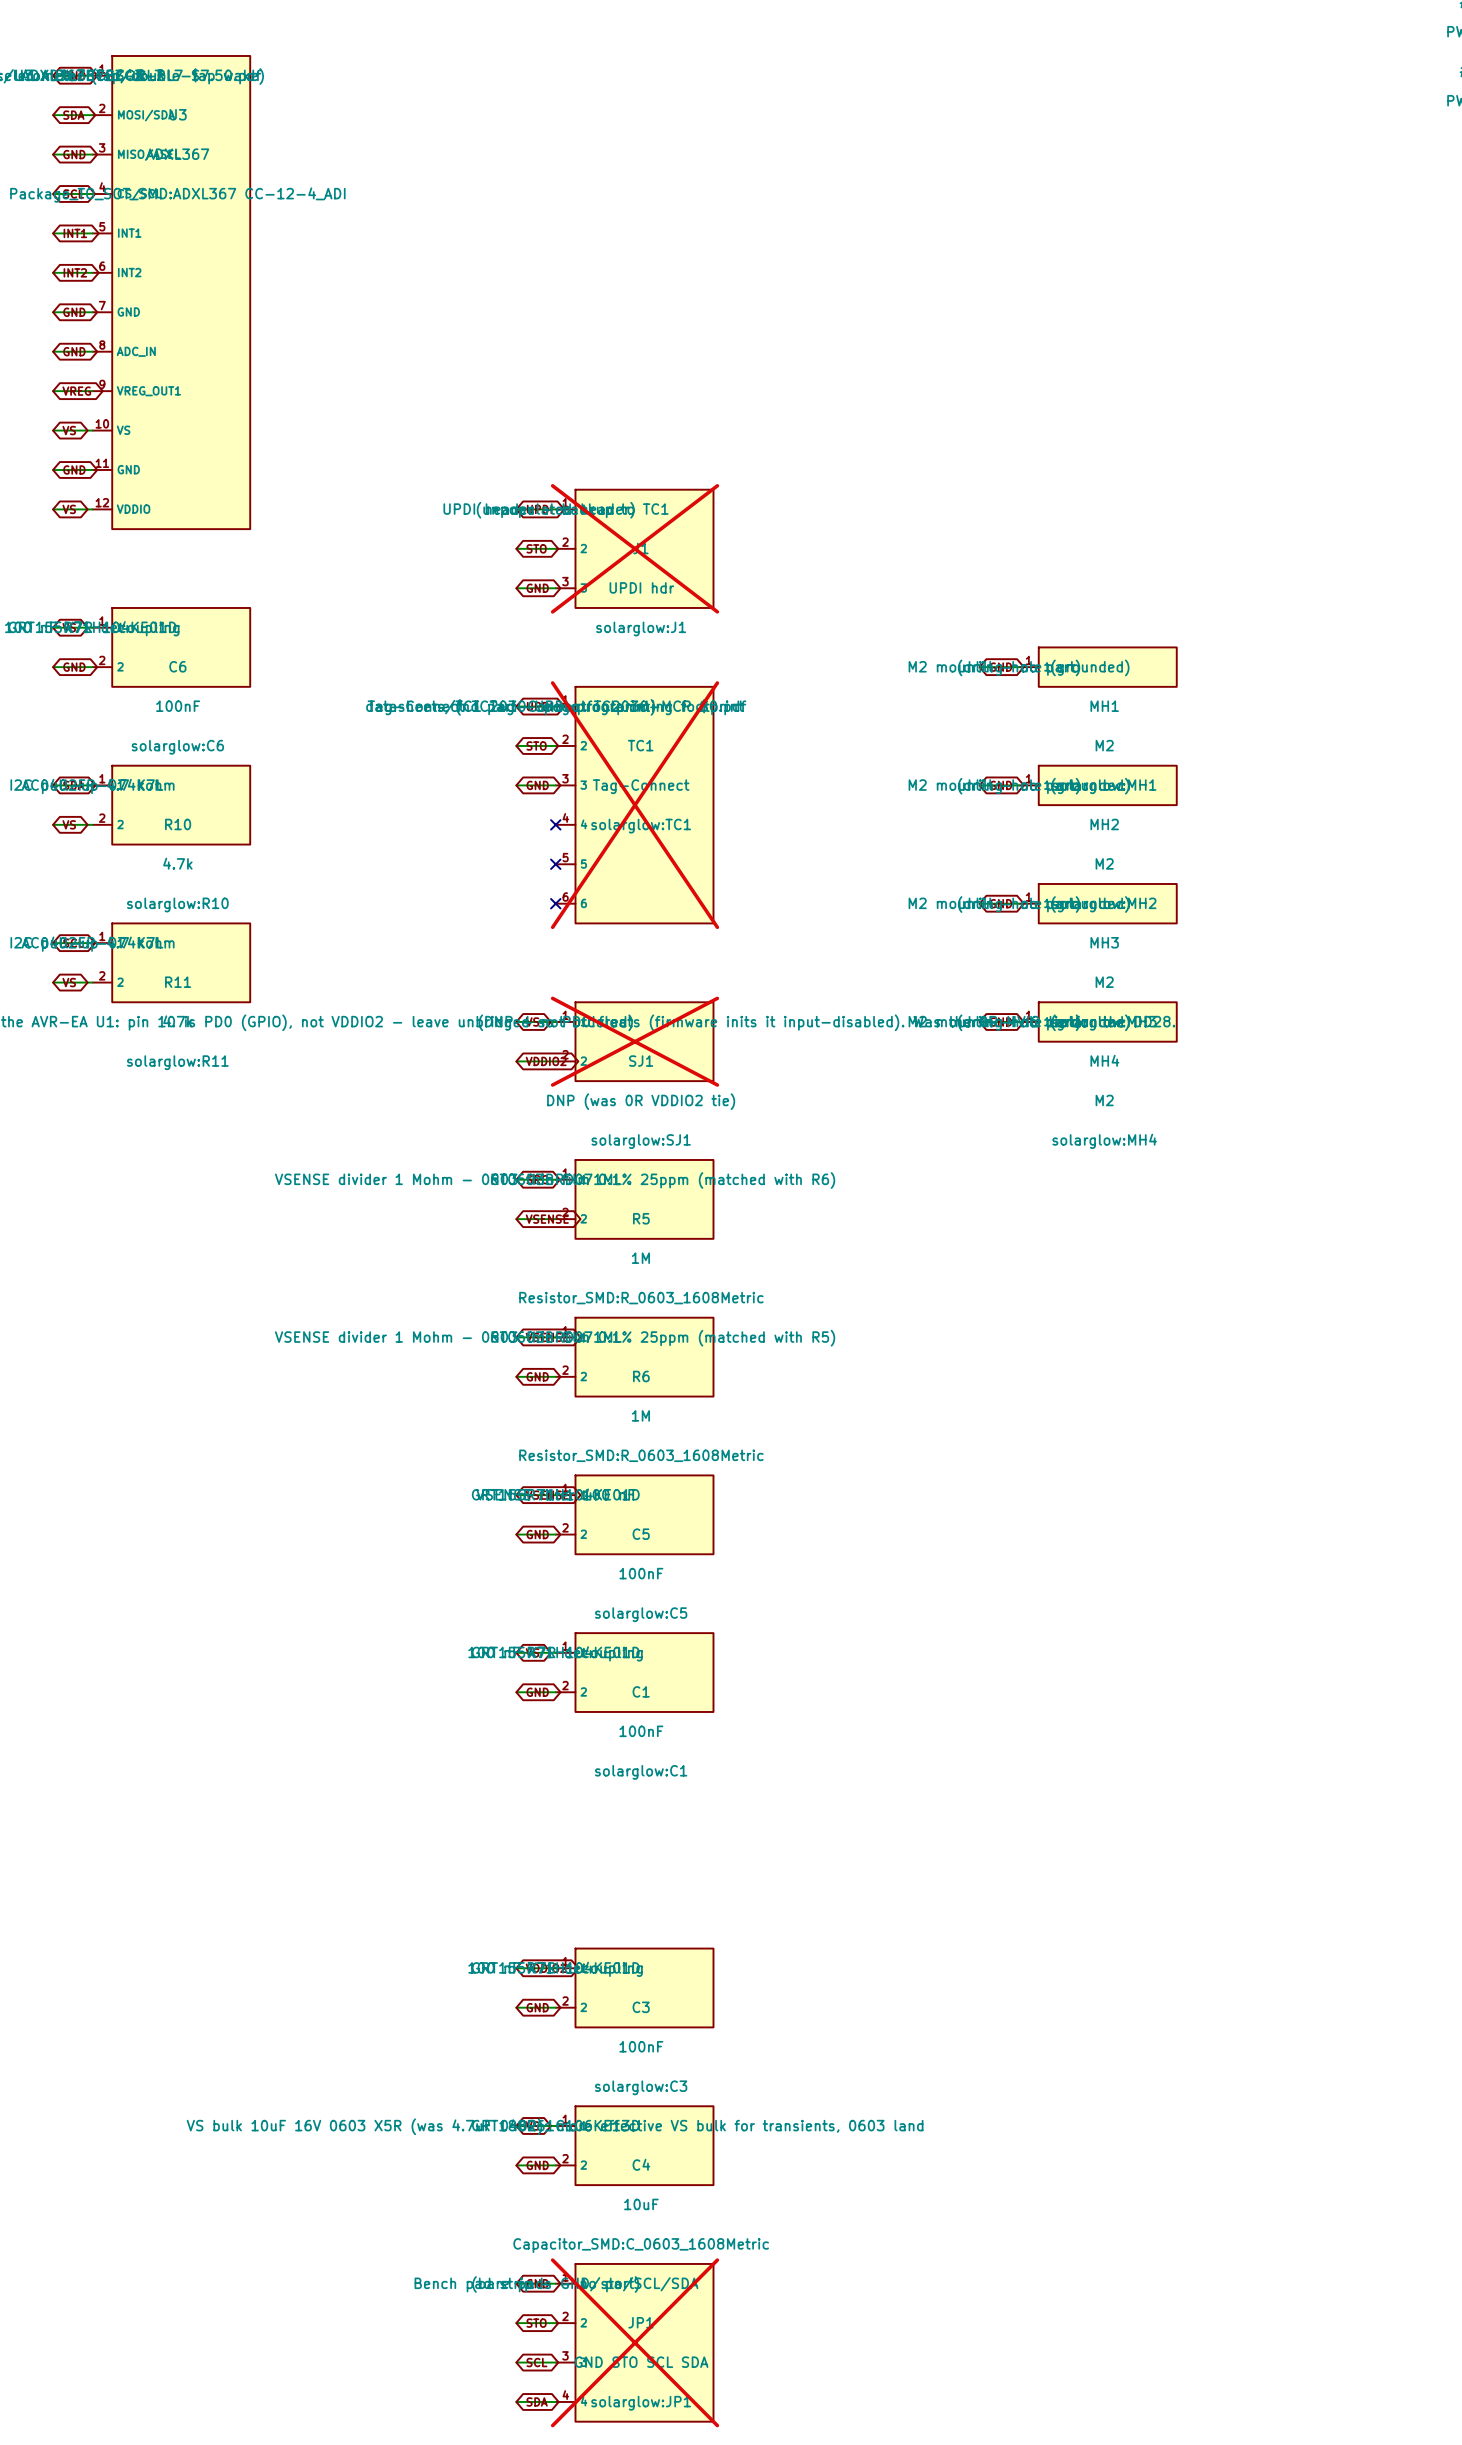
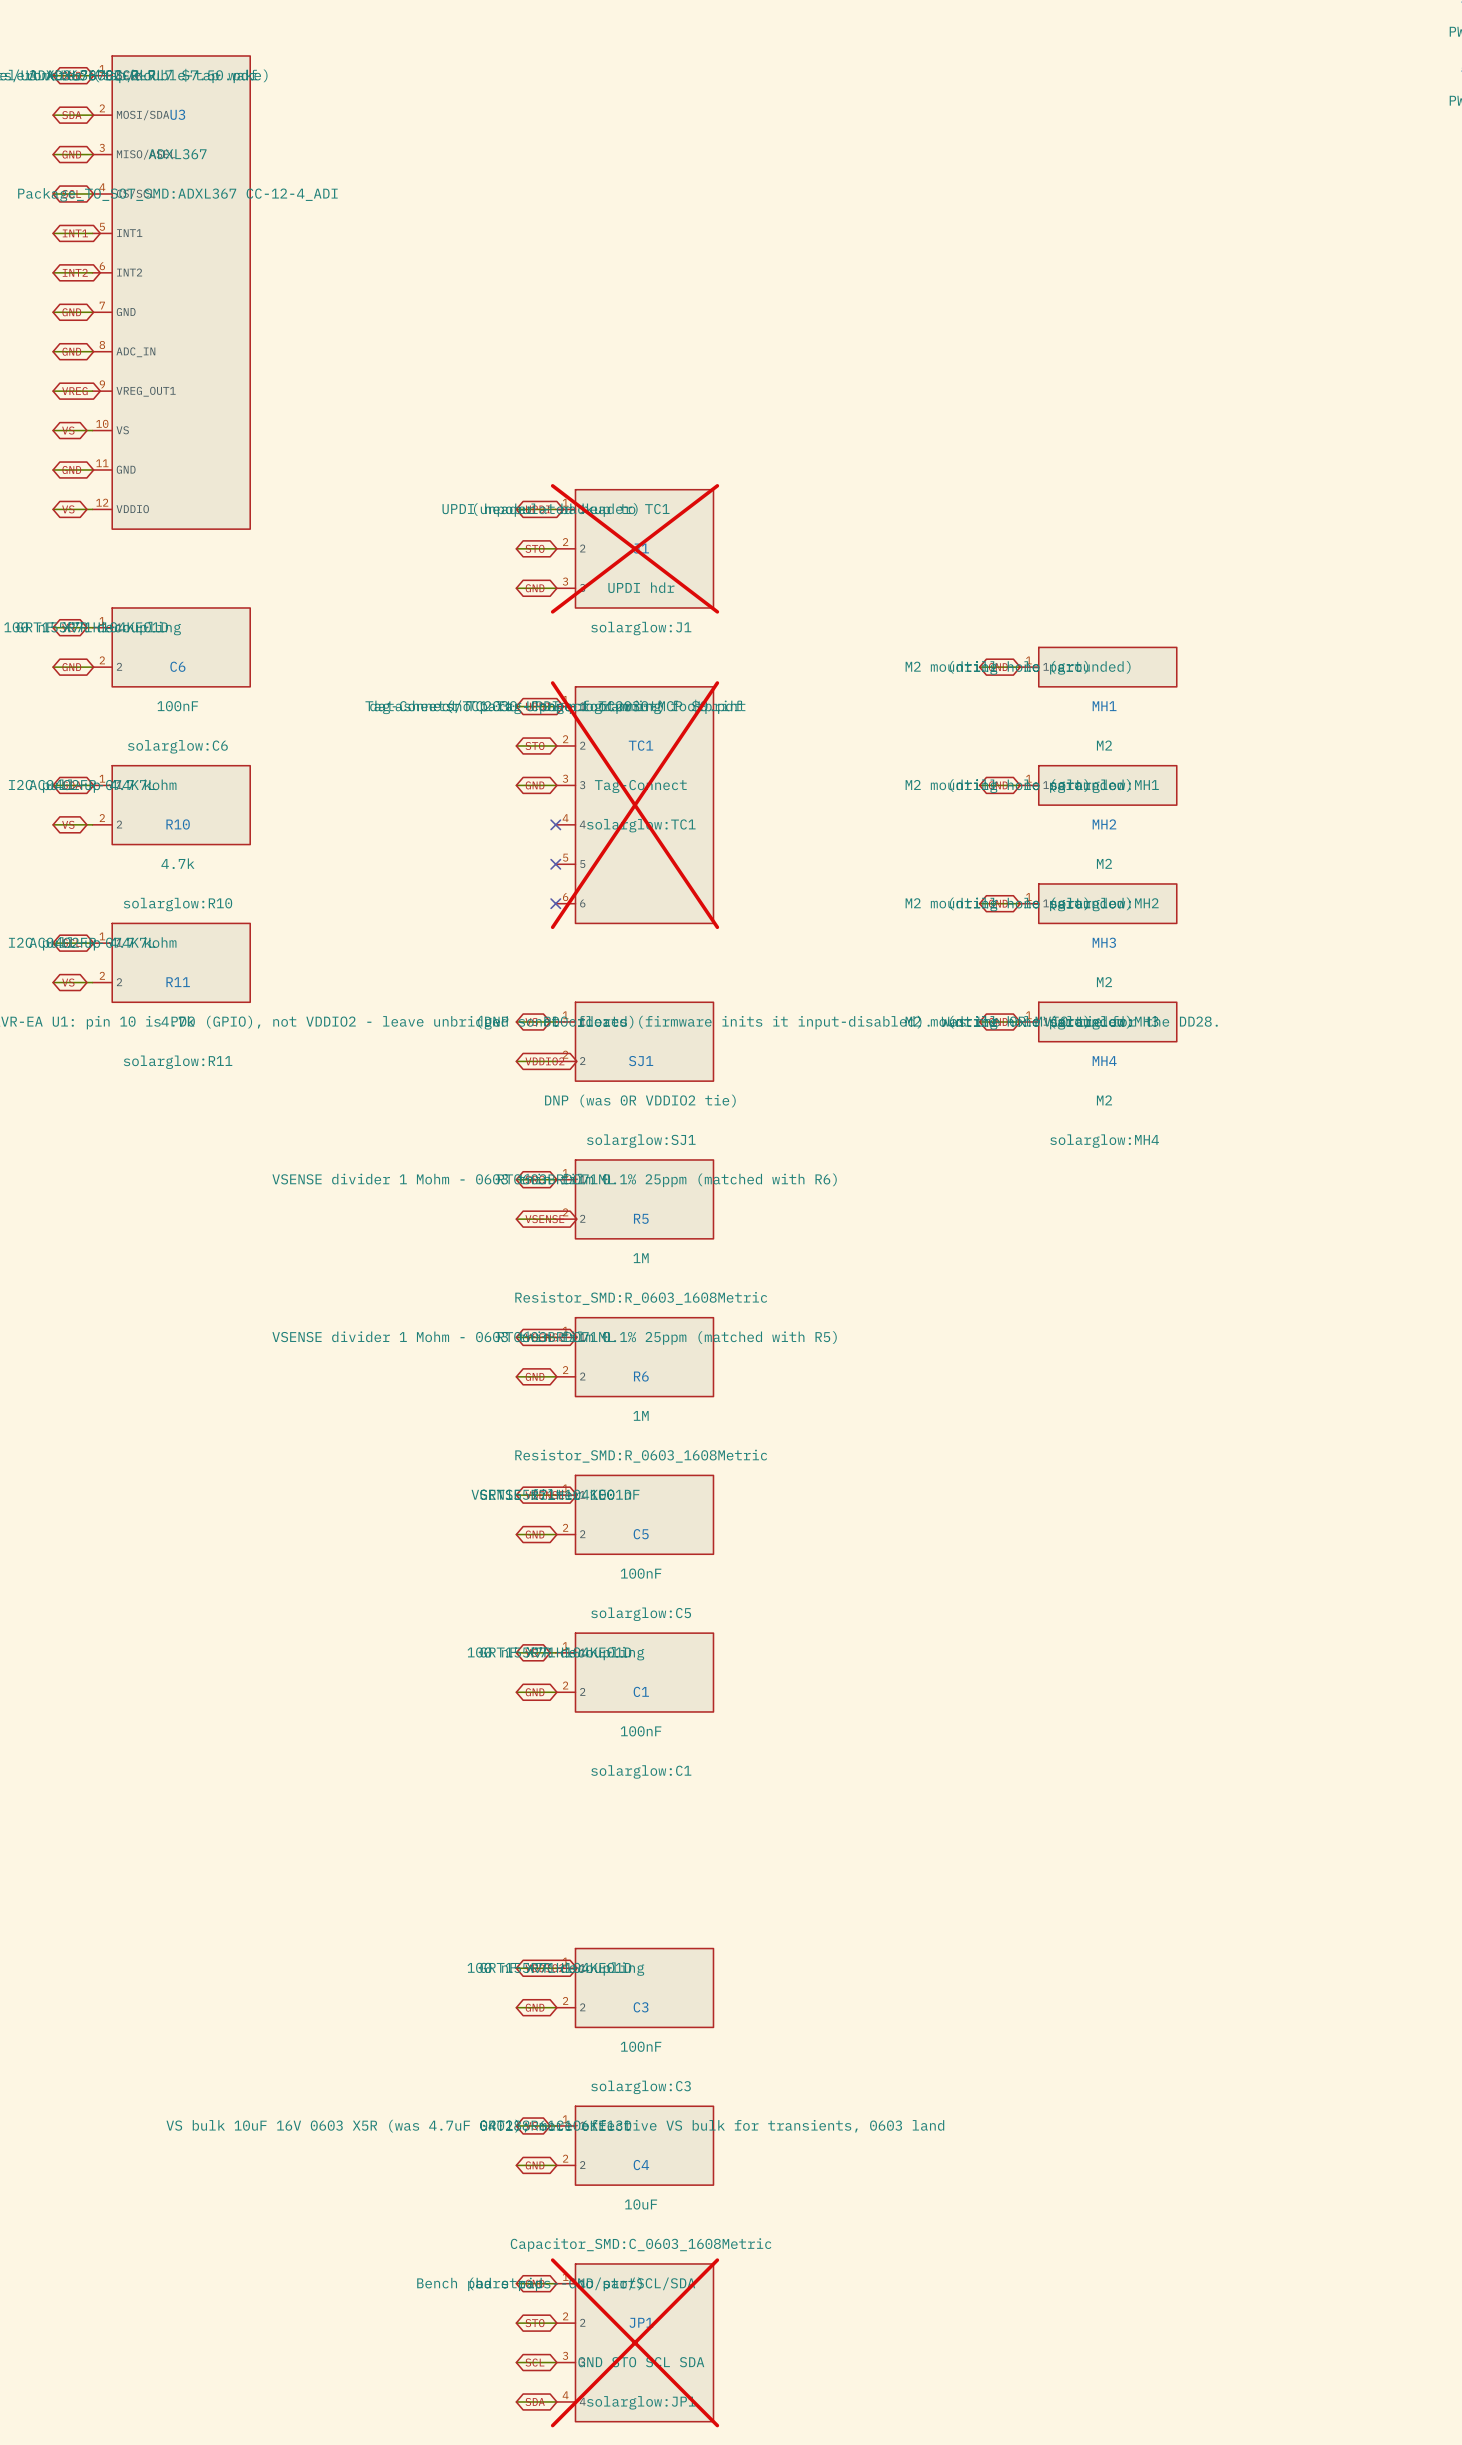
SJ1 do-not-place cross: (635, 1041) -> none

